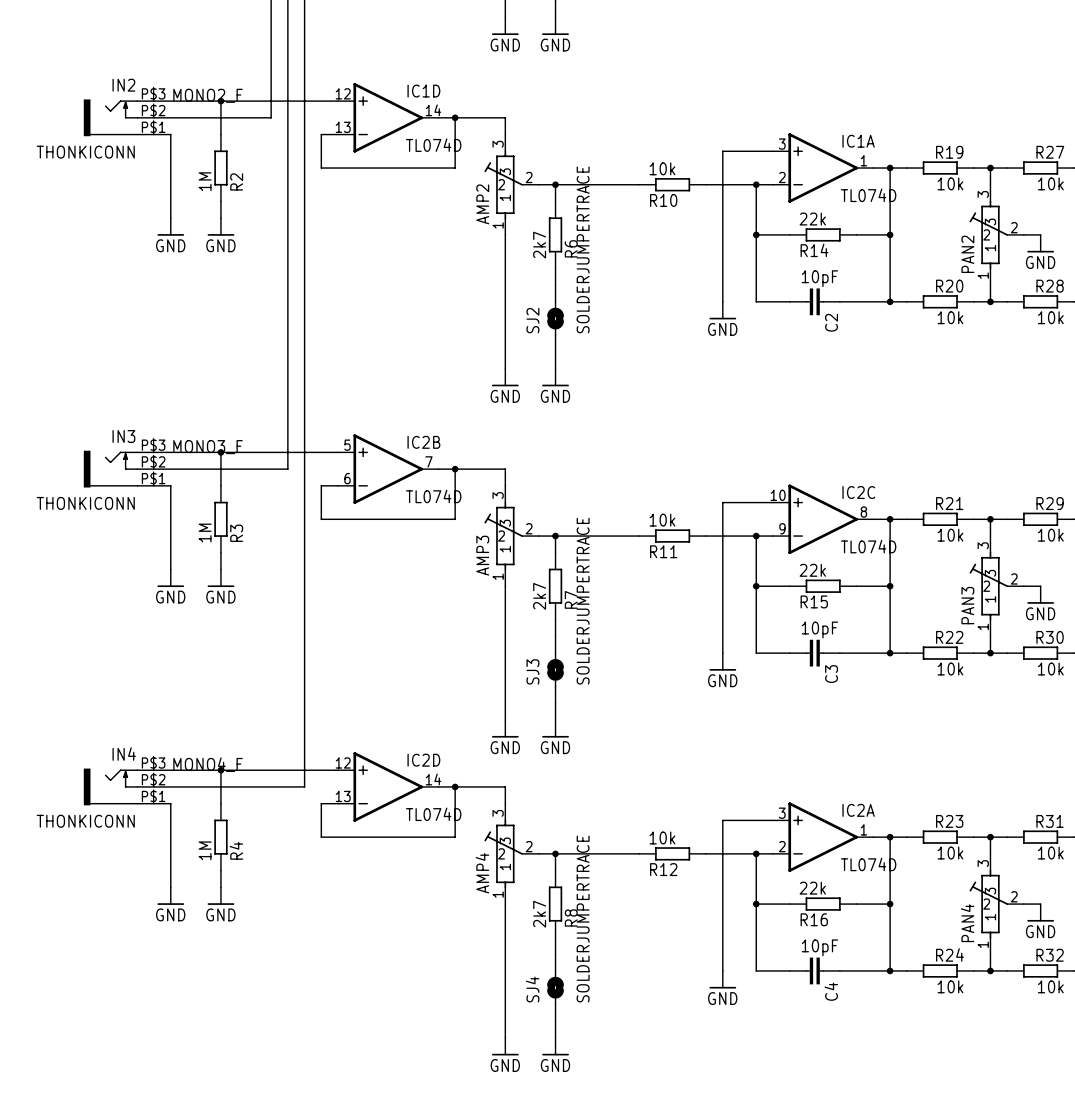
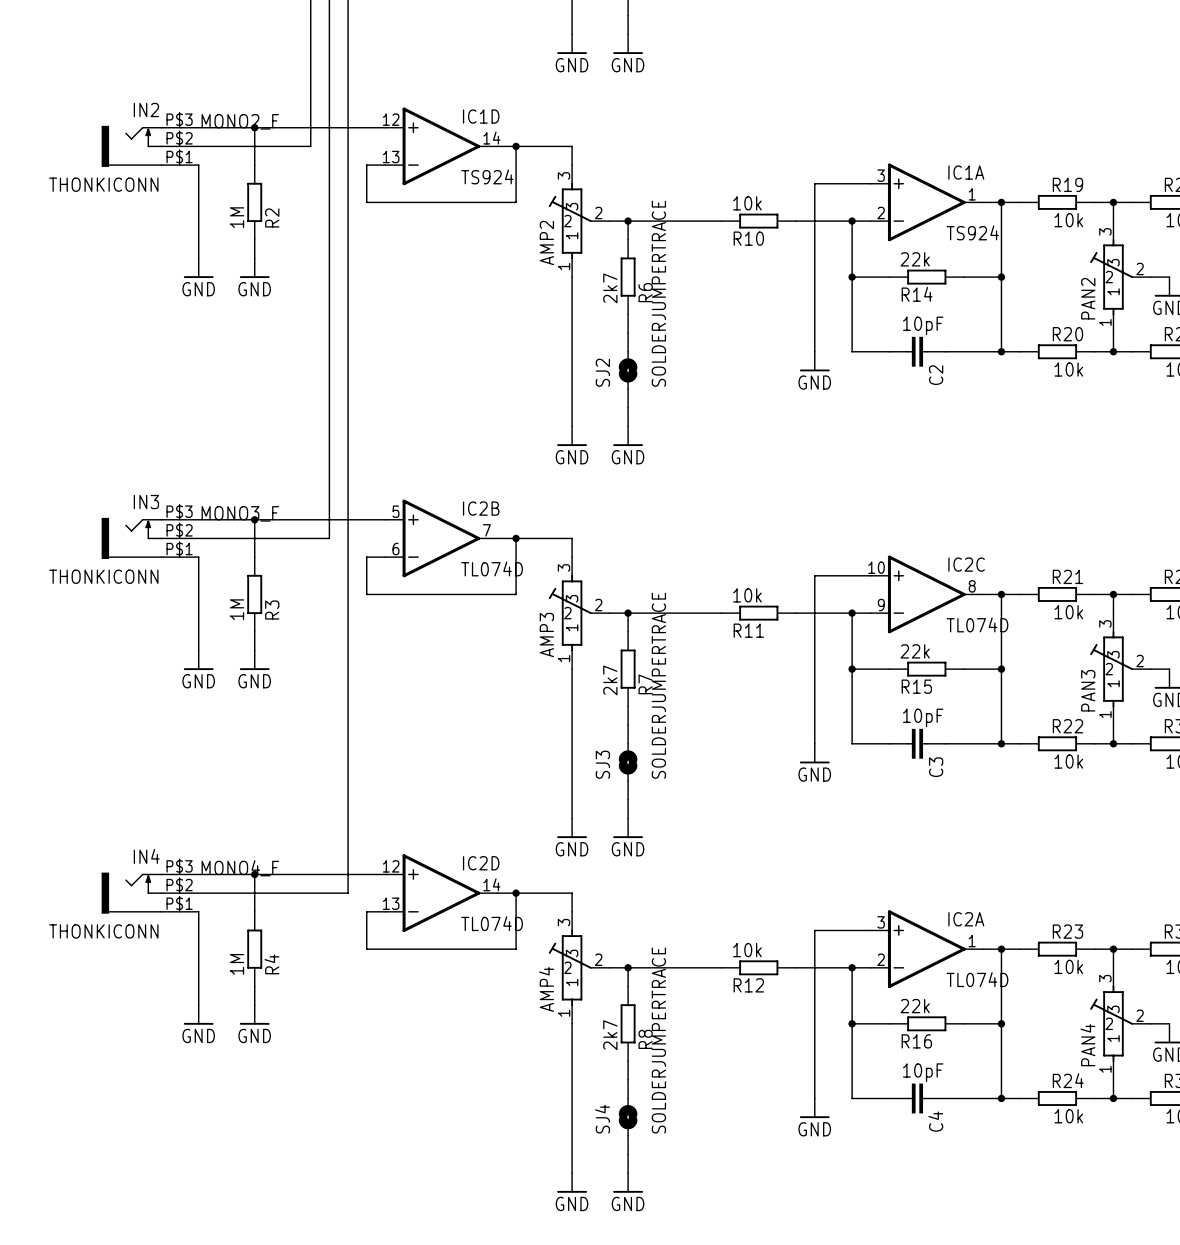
IC1D value: TL074D (433, 145) -> TS924 (487, 176)
IC1A value: TL074D (868, 195) -> TS924 (972, 232)

